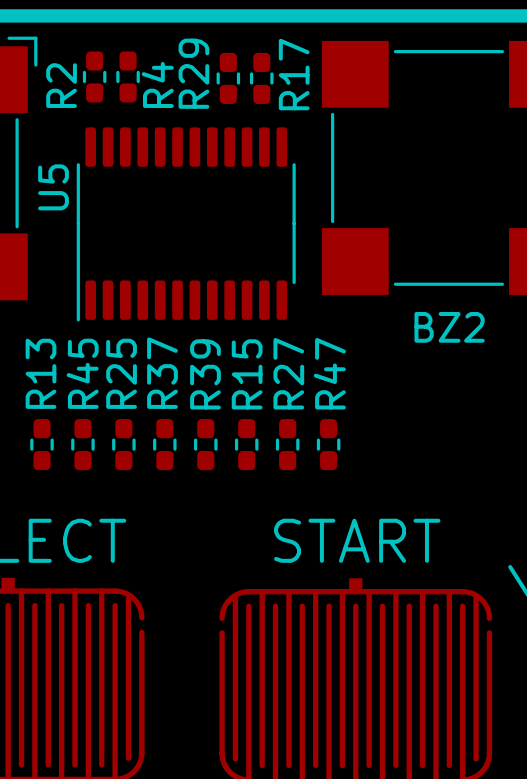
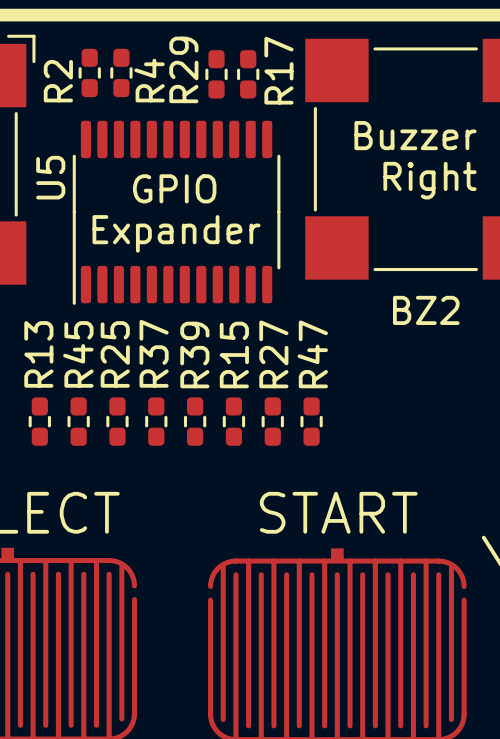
text: none -> Buzzer (415, 135)
text: none -> Right (429, 180)
text: none -> GPIO (174, 188)
text: none -> Expander (176, 233)

